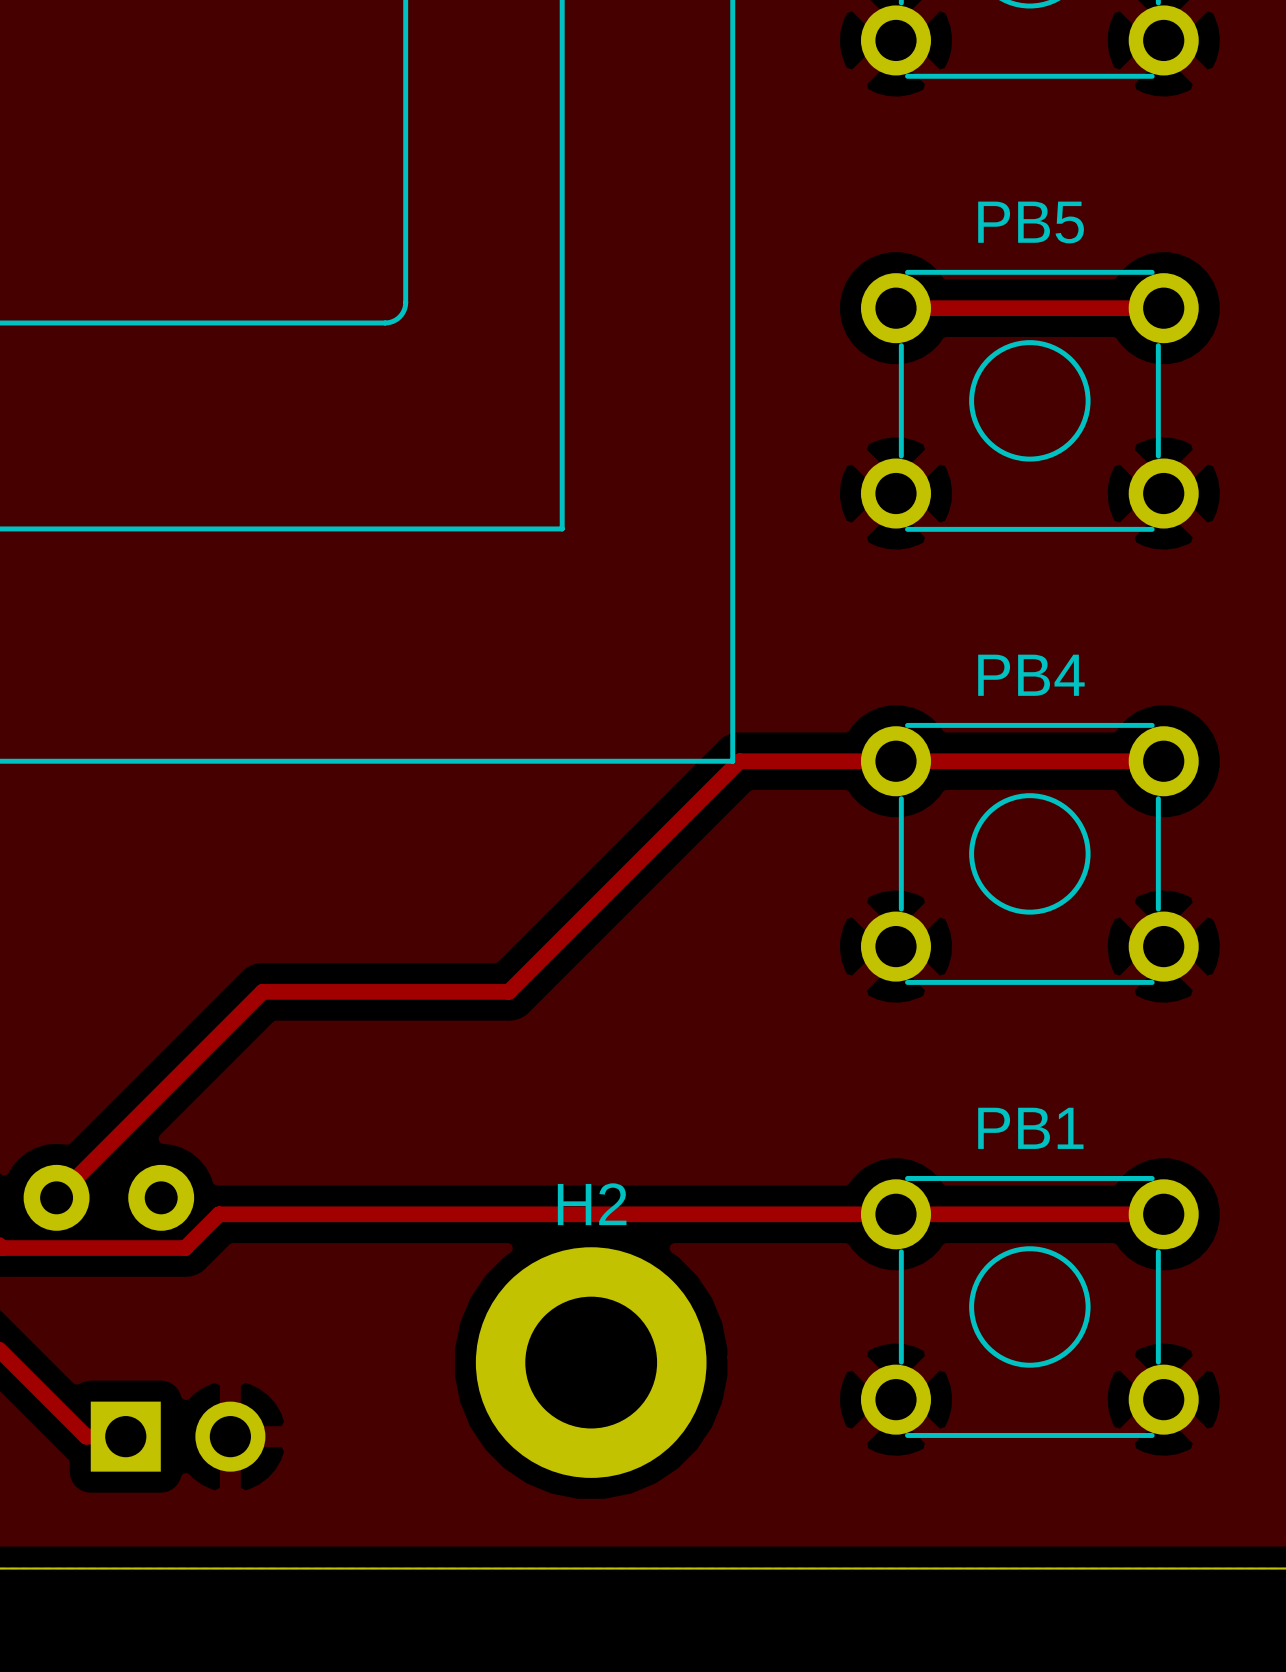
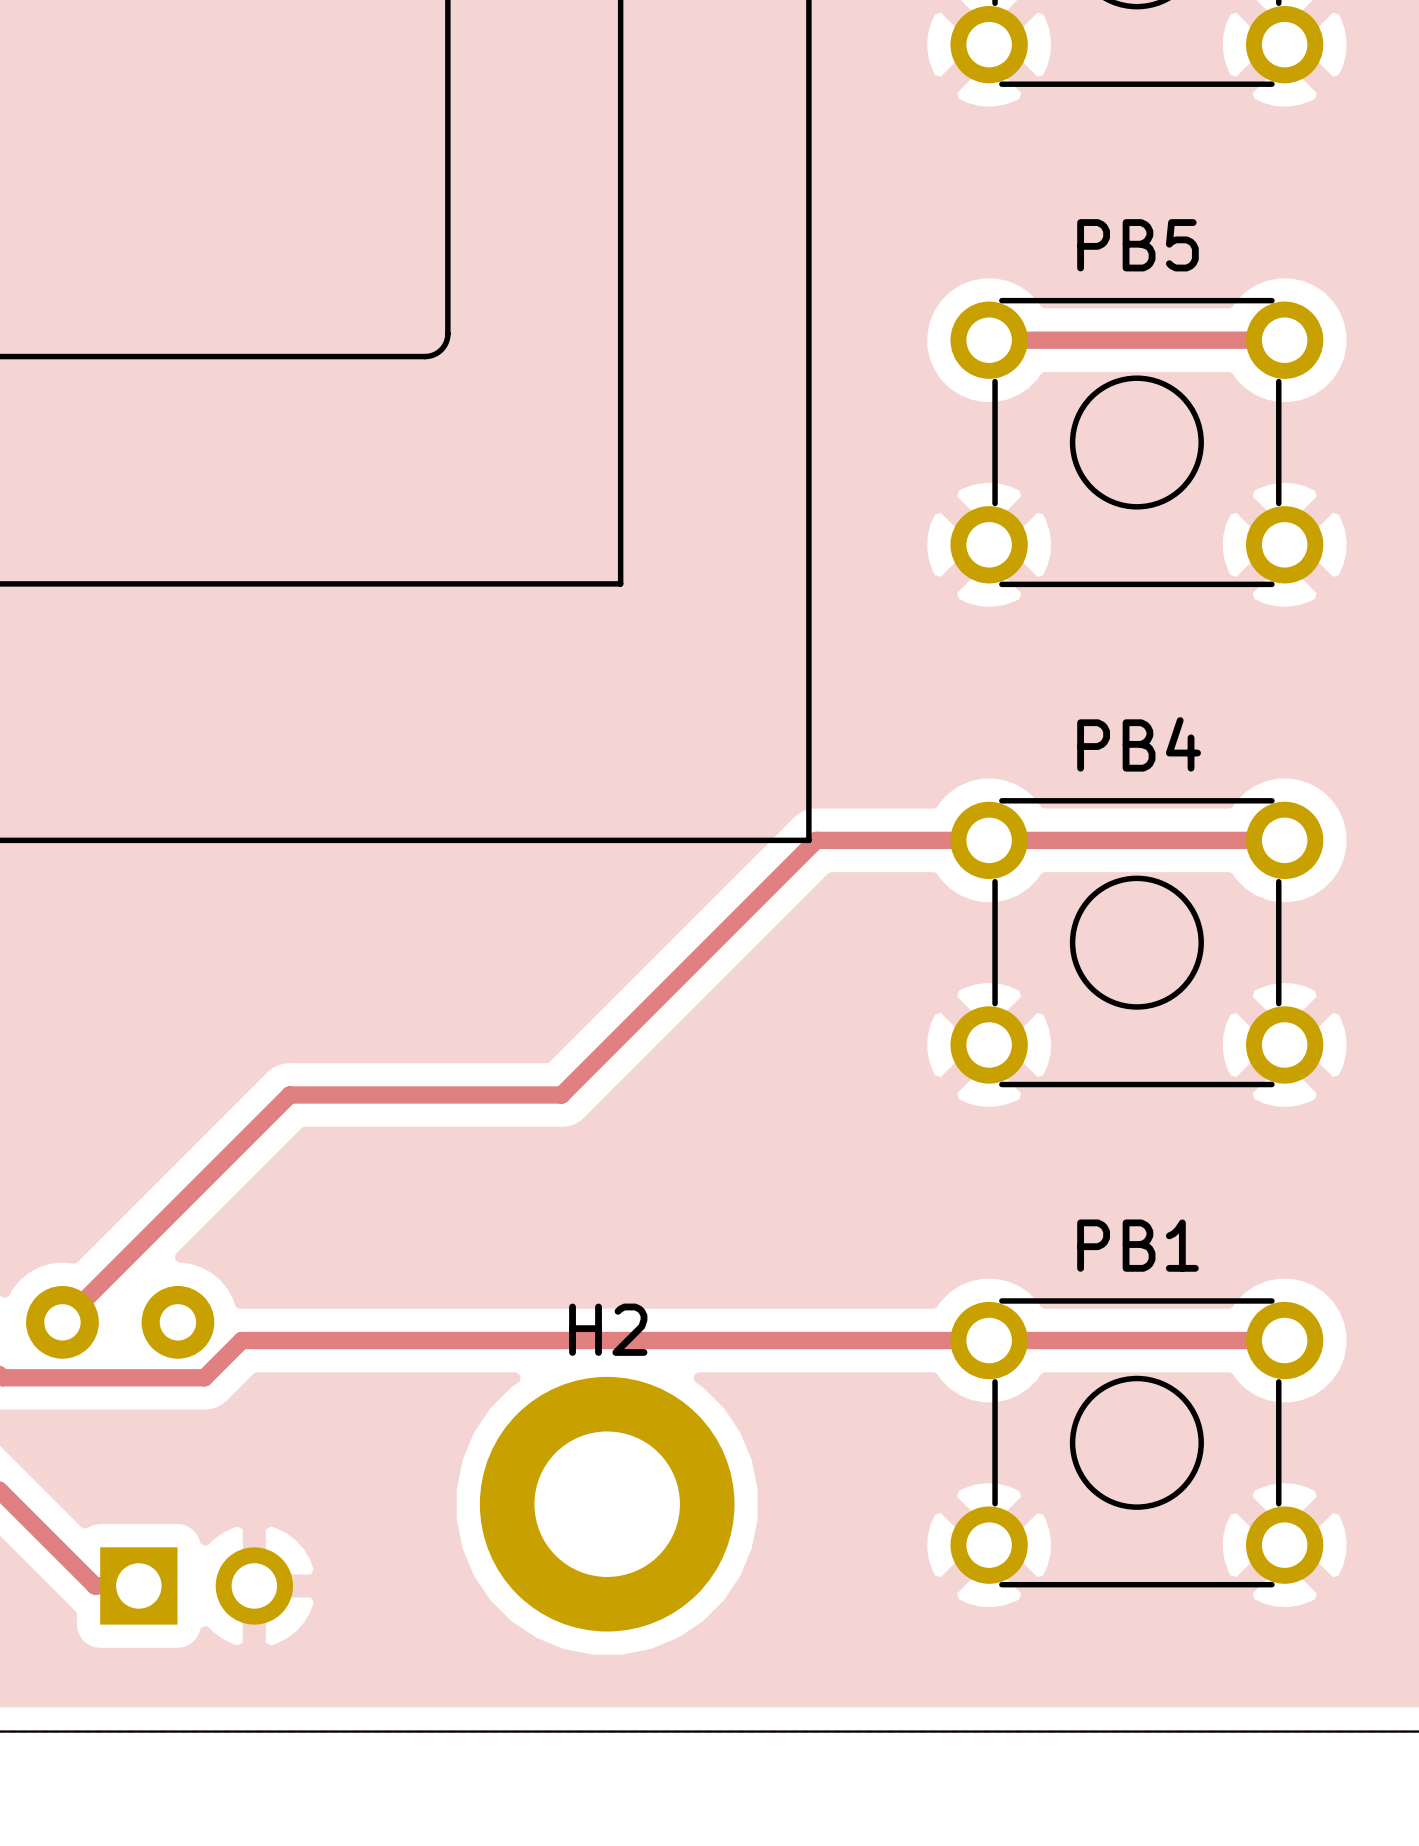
H2 position: (591, 1362) -> (607, 1504)

